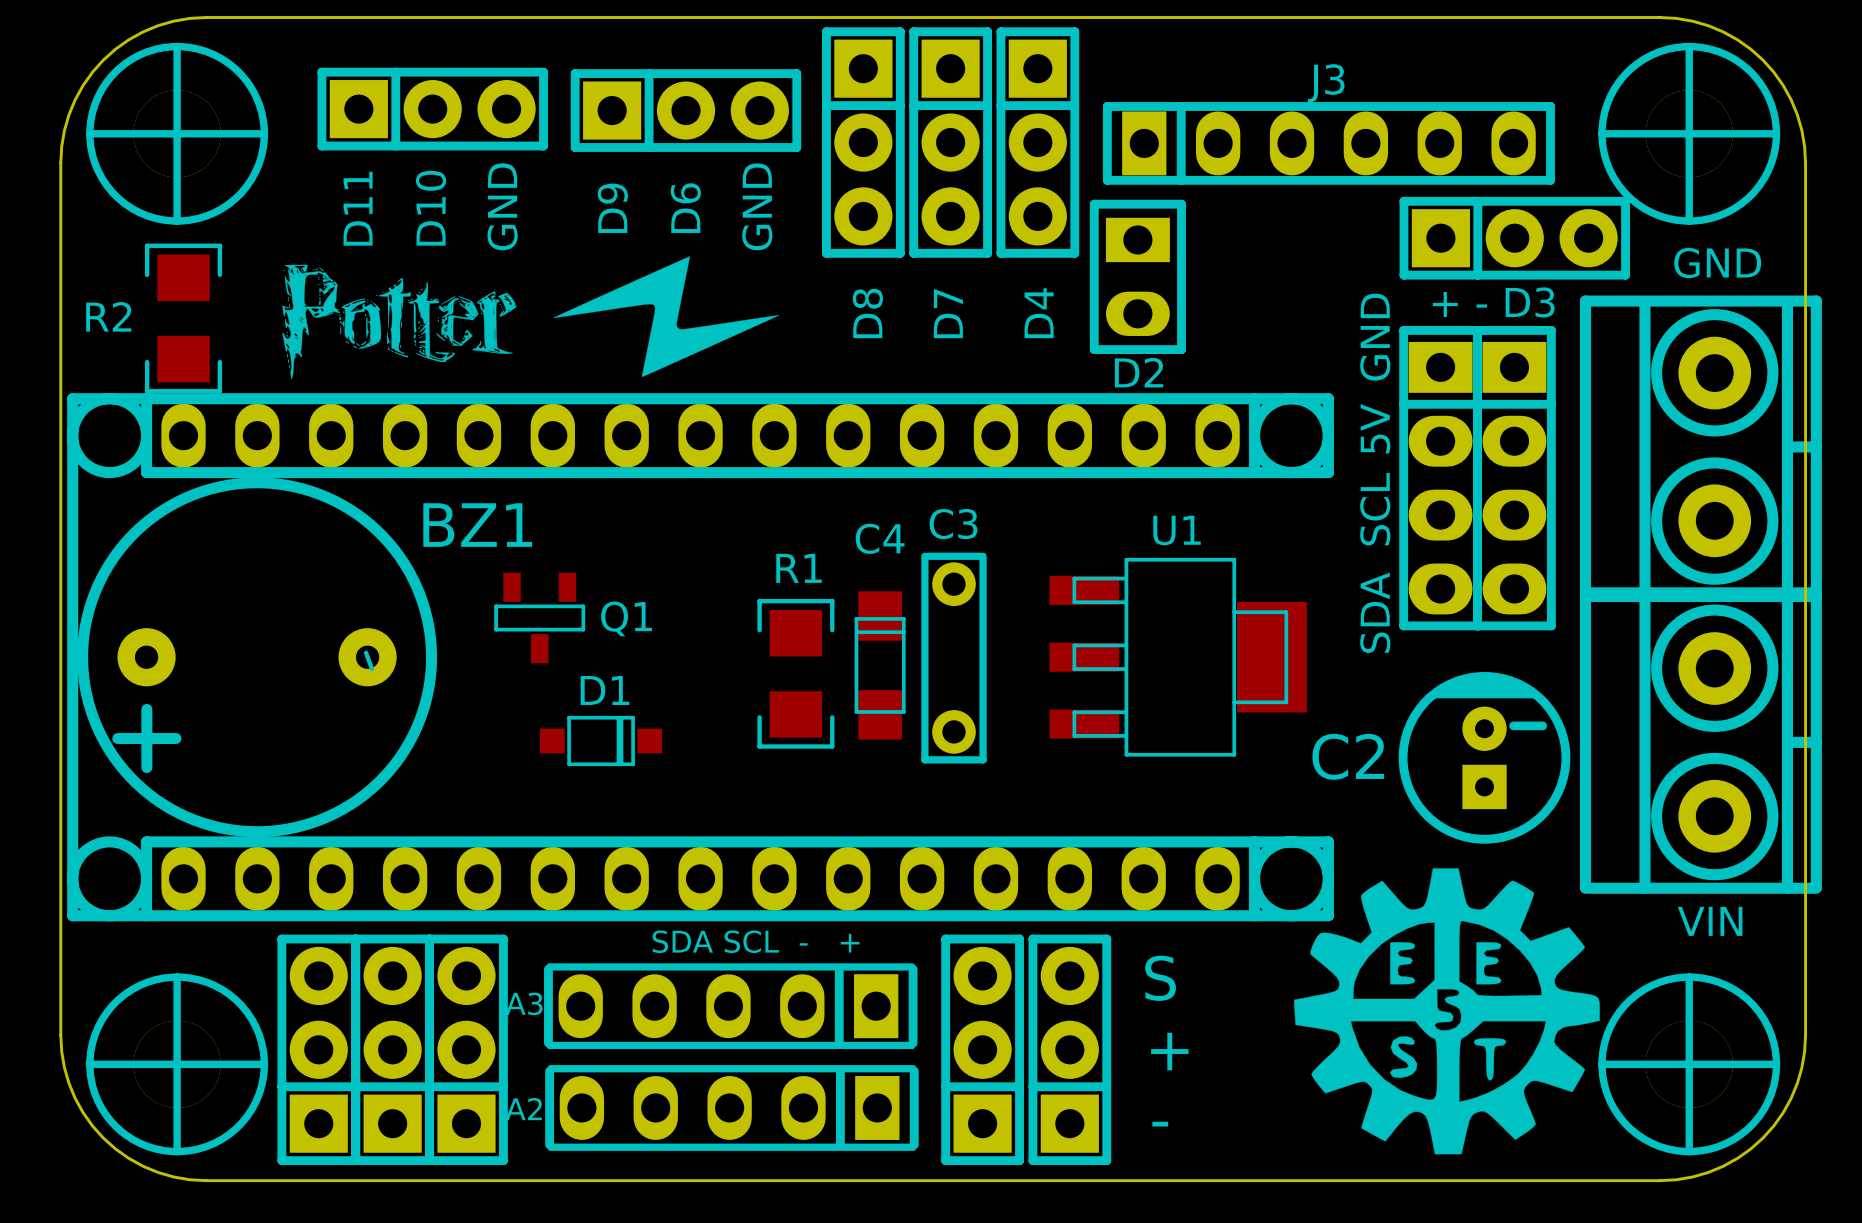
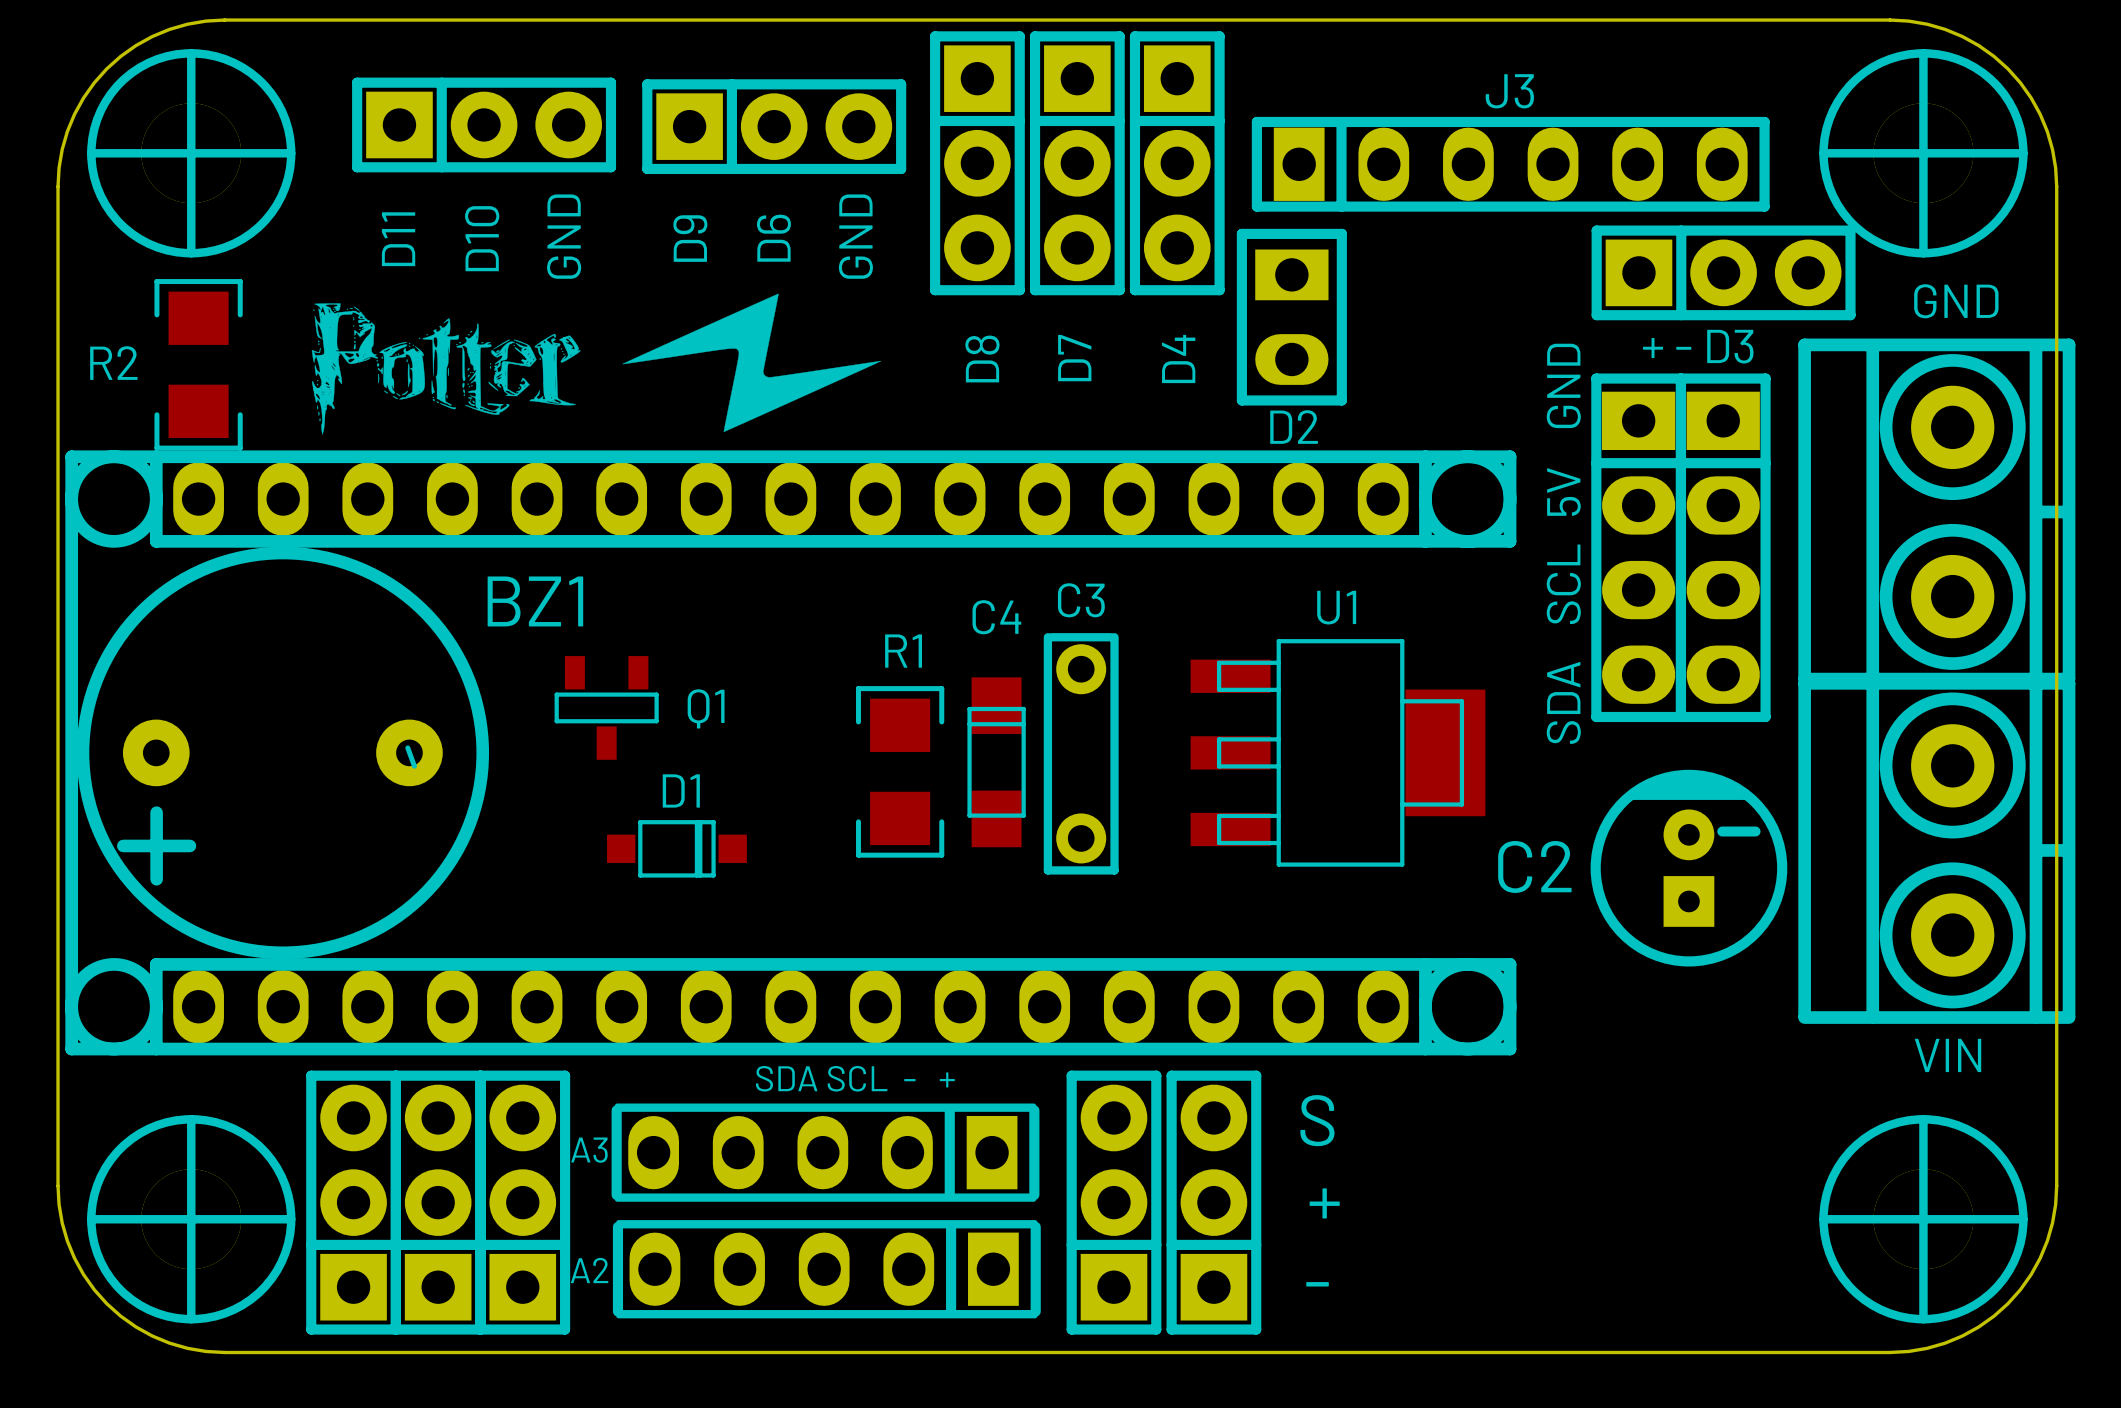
drawing: [1293, 868, 1600, 1155] -> none

